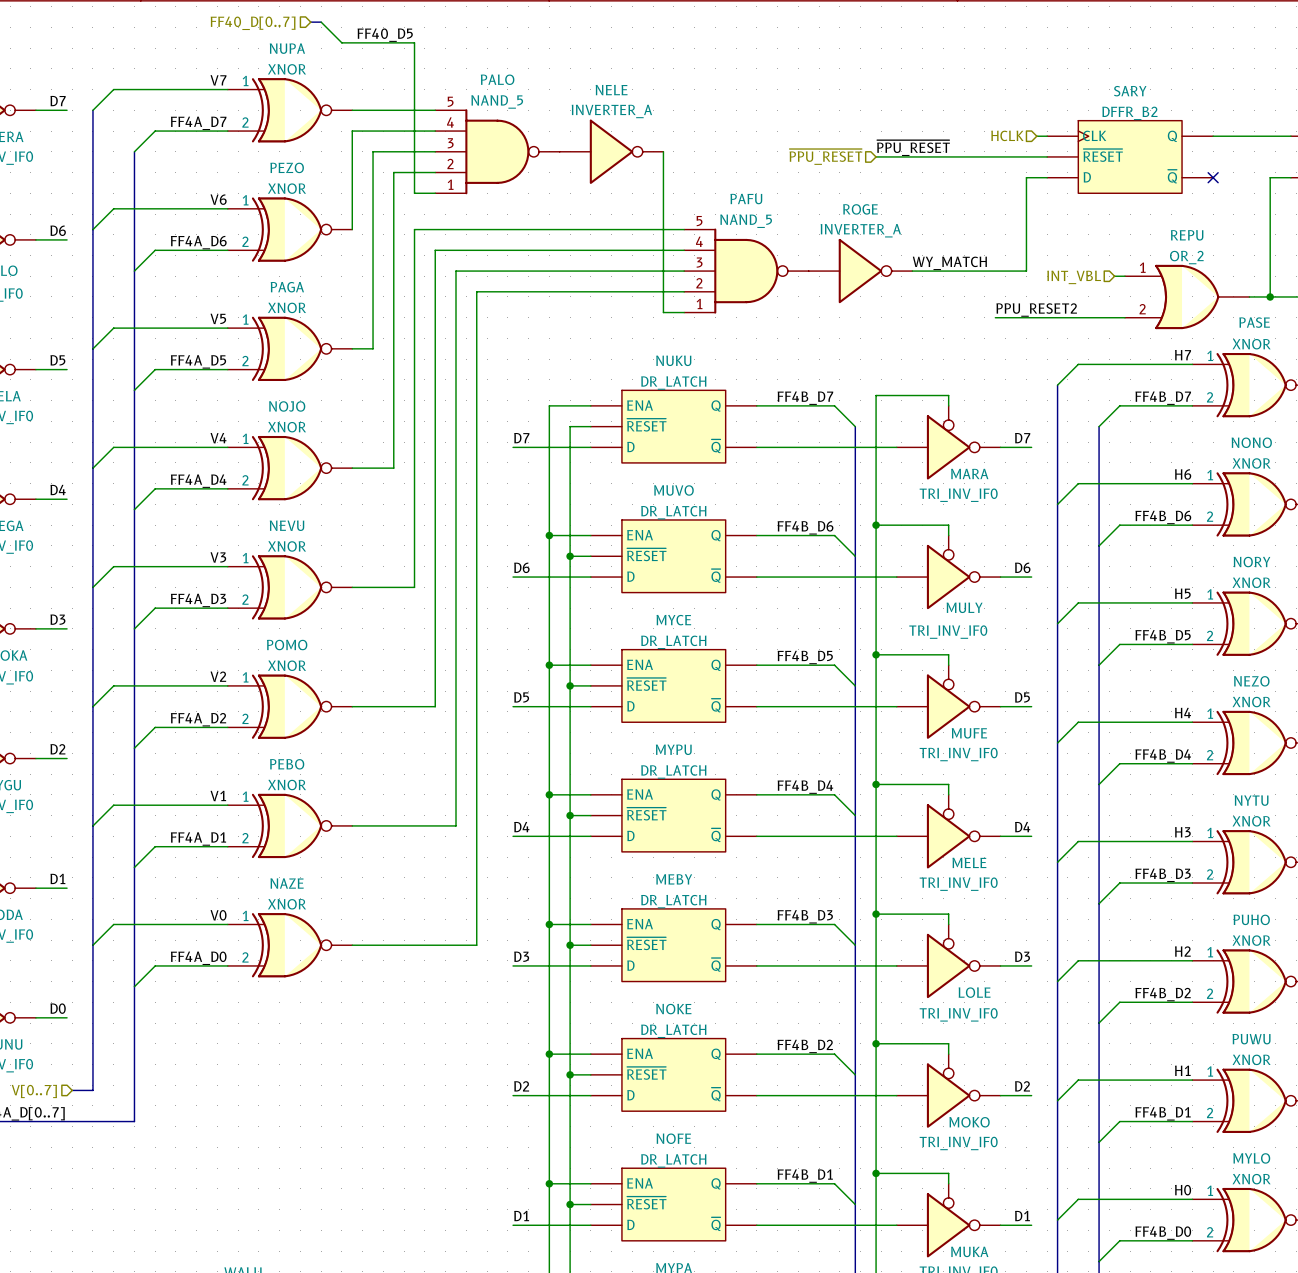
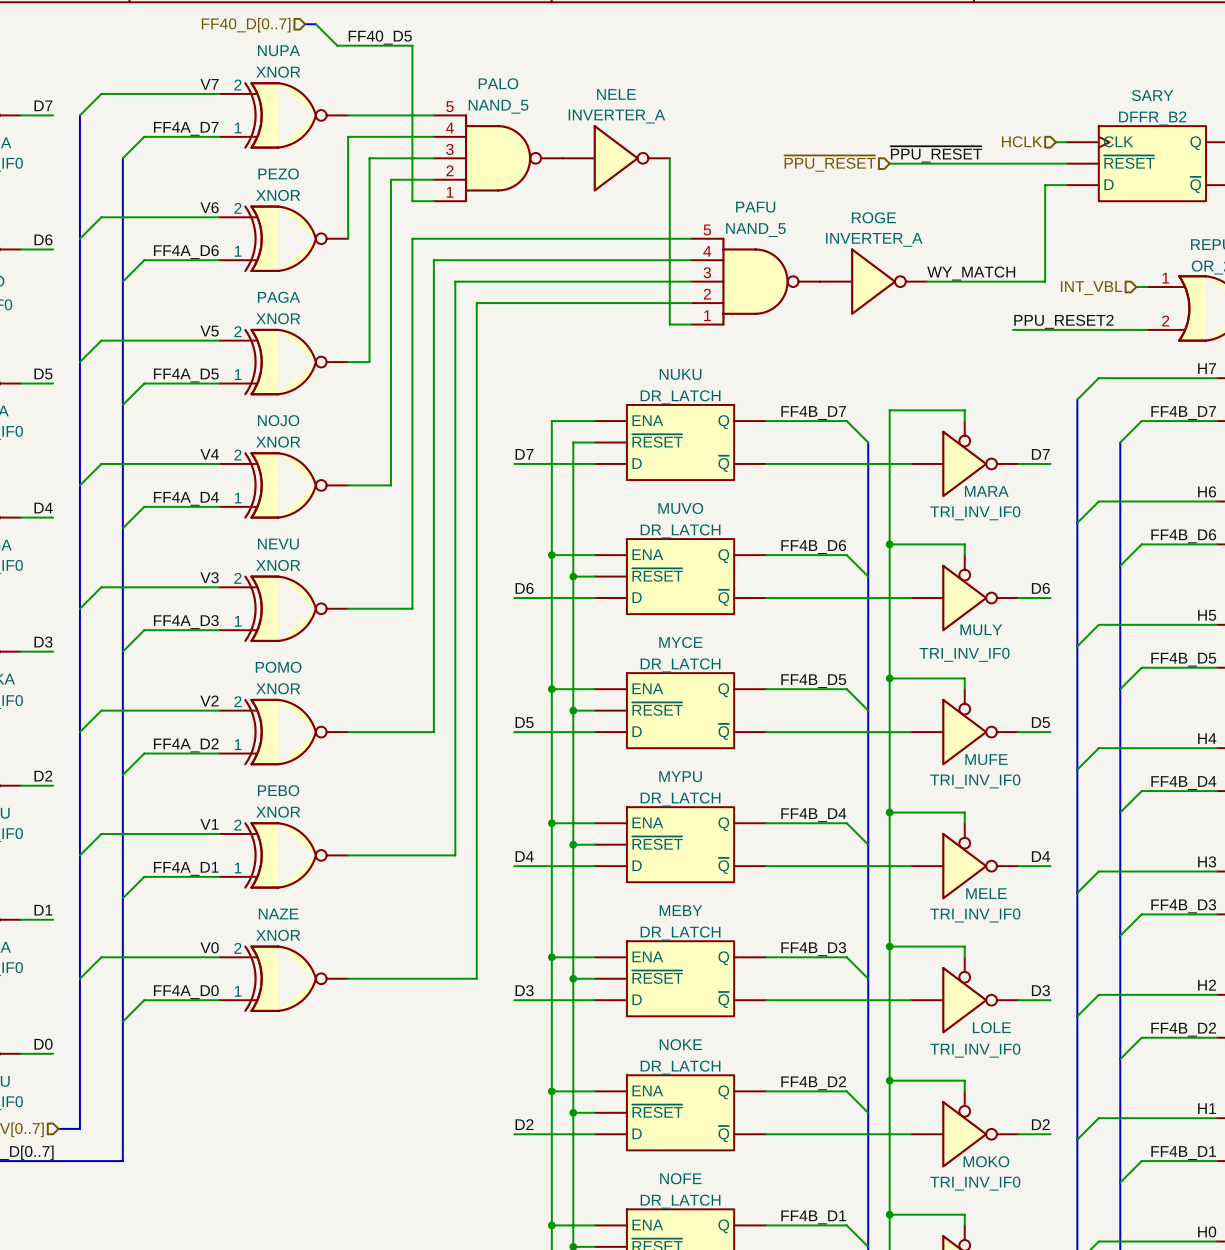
NUPA flip: as is (287, 110) -> up-down (280, 115)
PEZO flip: as is (287, 229) -> up-down (280, 238)
PAGA flip: as is (287, 348) -> up-down (280, 362)
NOJO flip: as is (287, 468) -> up-down (280, 485)
NEVU flip: as is (287, 587) -> up-down (280, 608)
POMO flip: as is (287, 706) -> up-down (280, 732)
PEBO flip: as is (287, 825) -> up-down (280, 855)
NAZE flip: as is (287, 945) -> up-down (280, 978)

